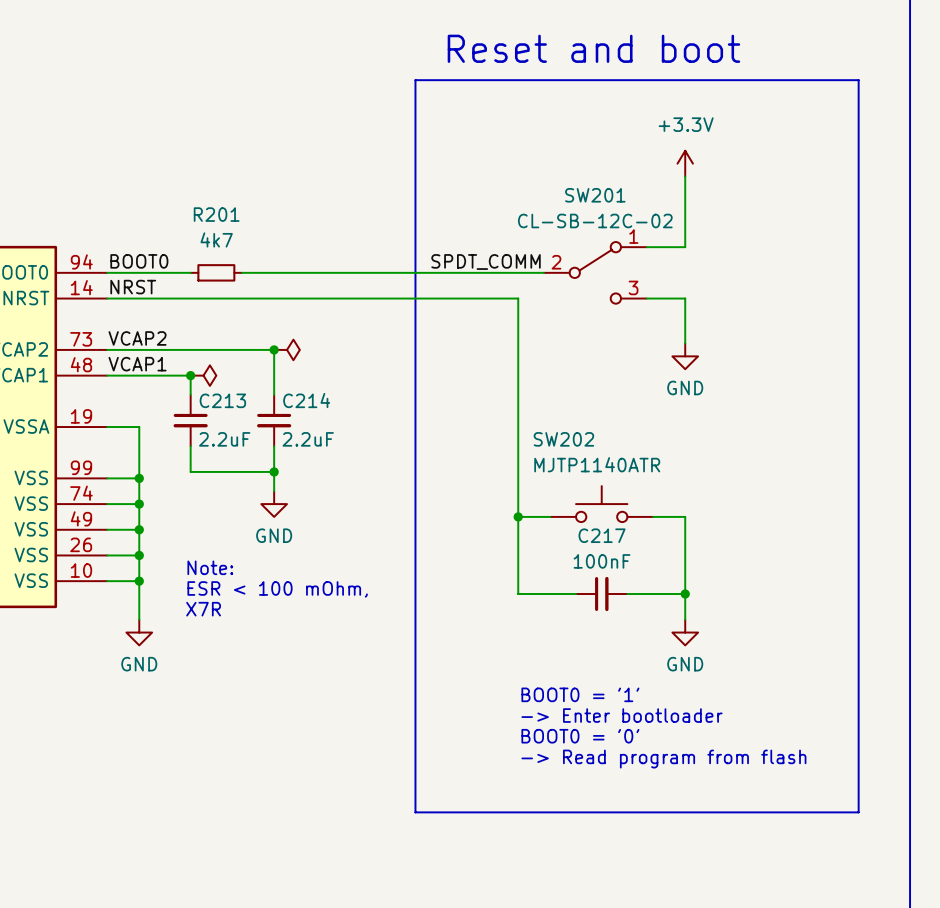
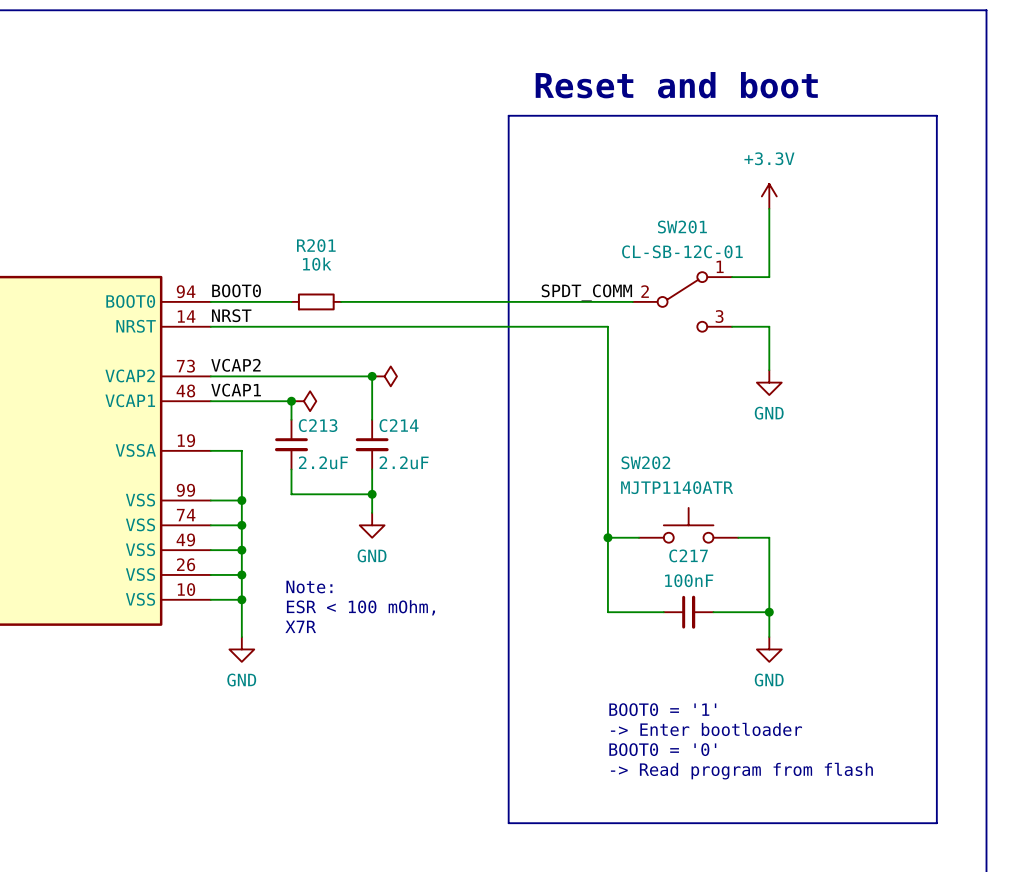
SW201 value: CL-SB-12C-02 (595, 220) -> CL-SB-12C-01 (682, 251)
R201 value: 4k7 (216, 239) -> 10k (317, 264)

